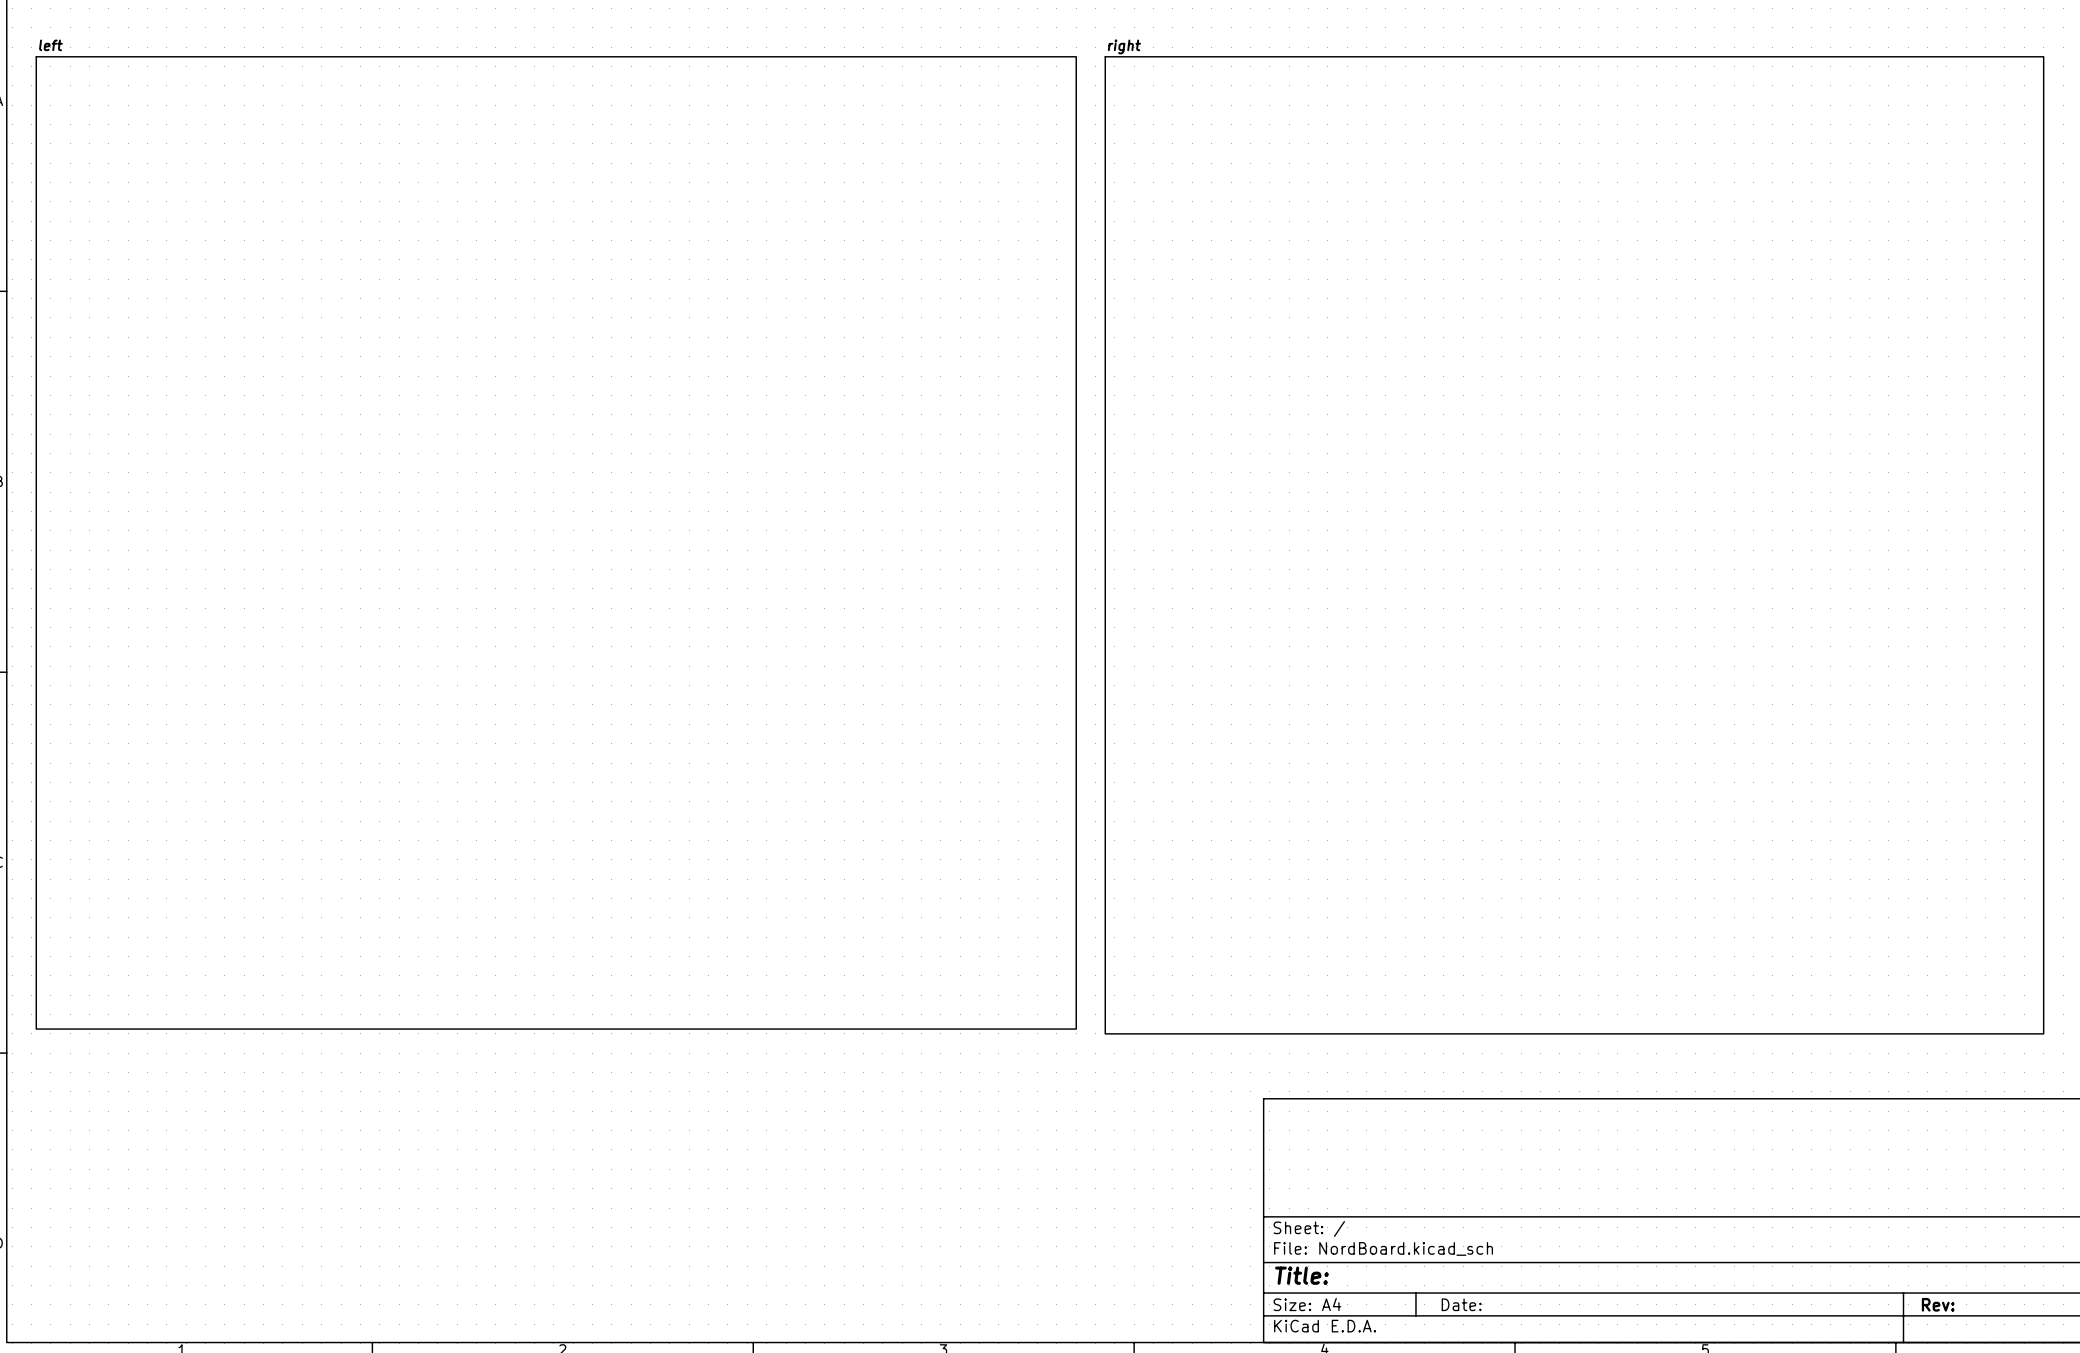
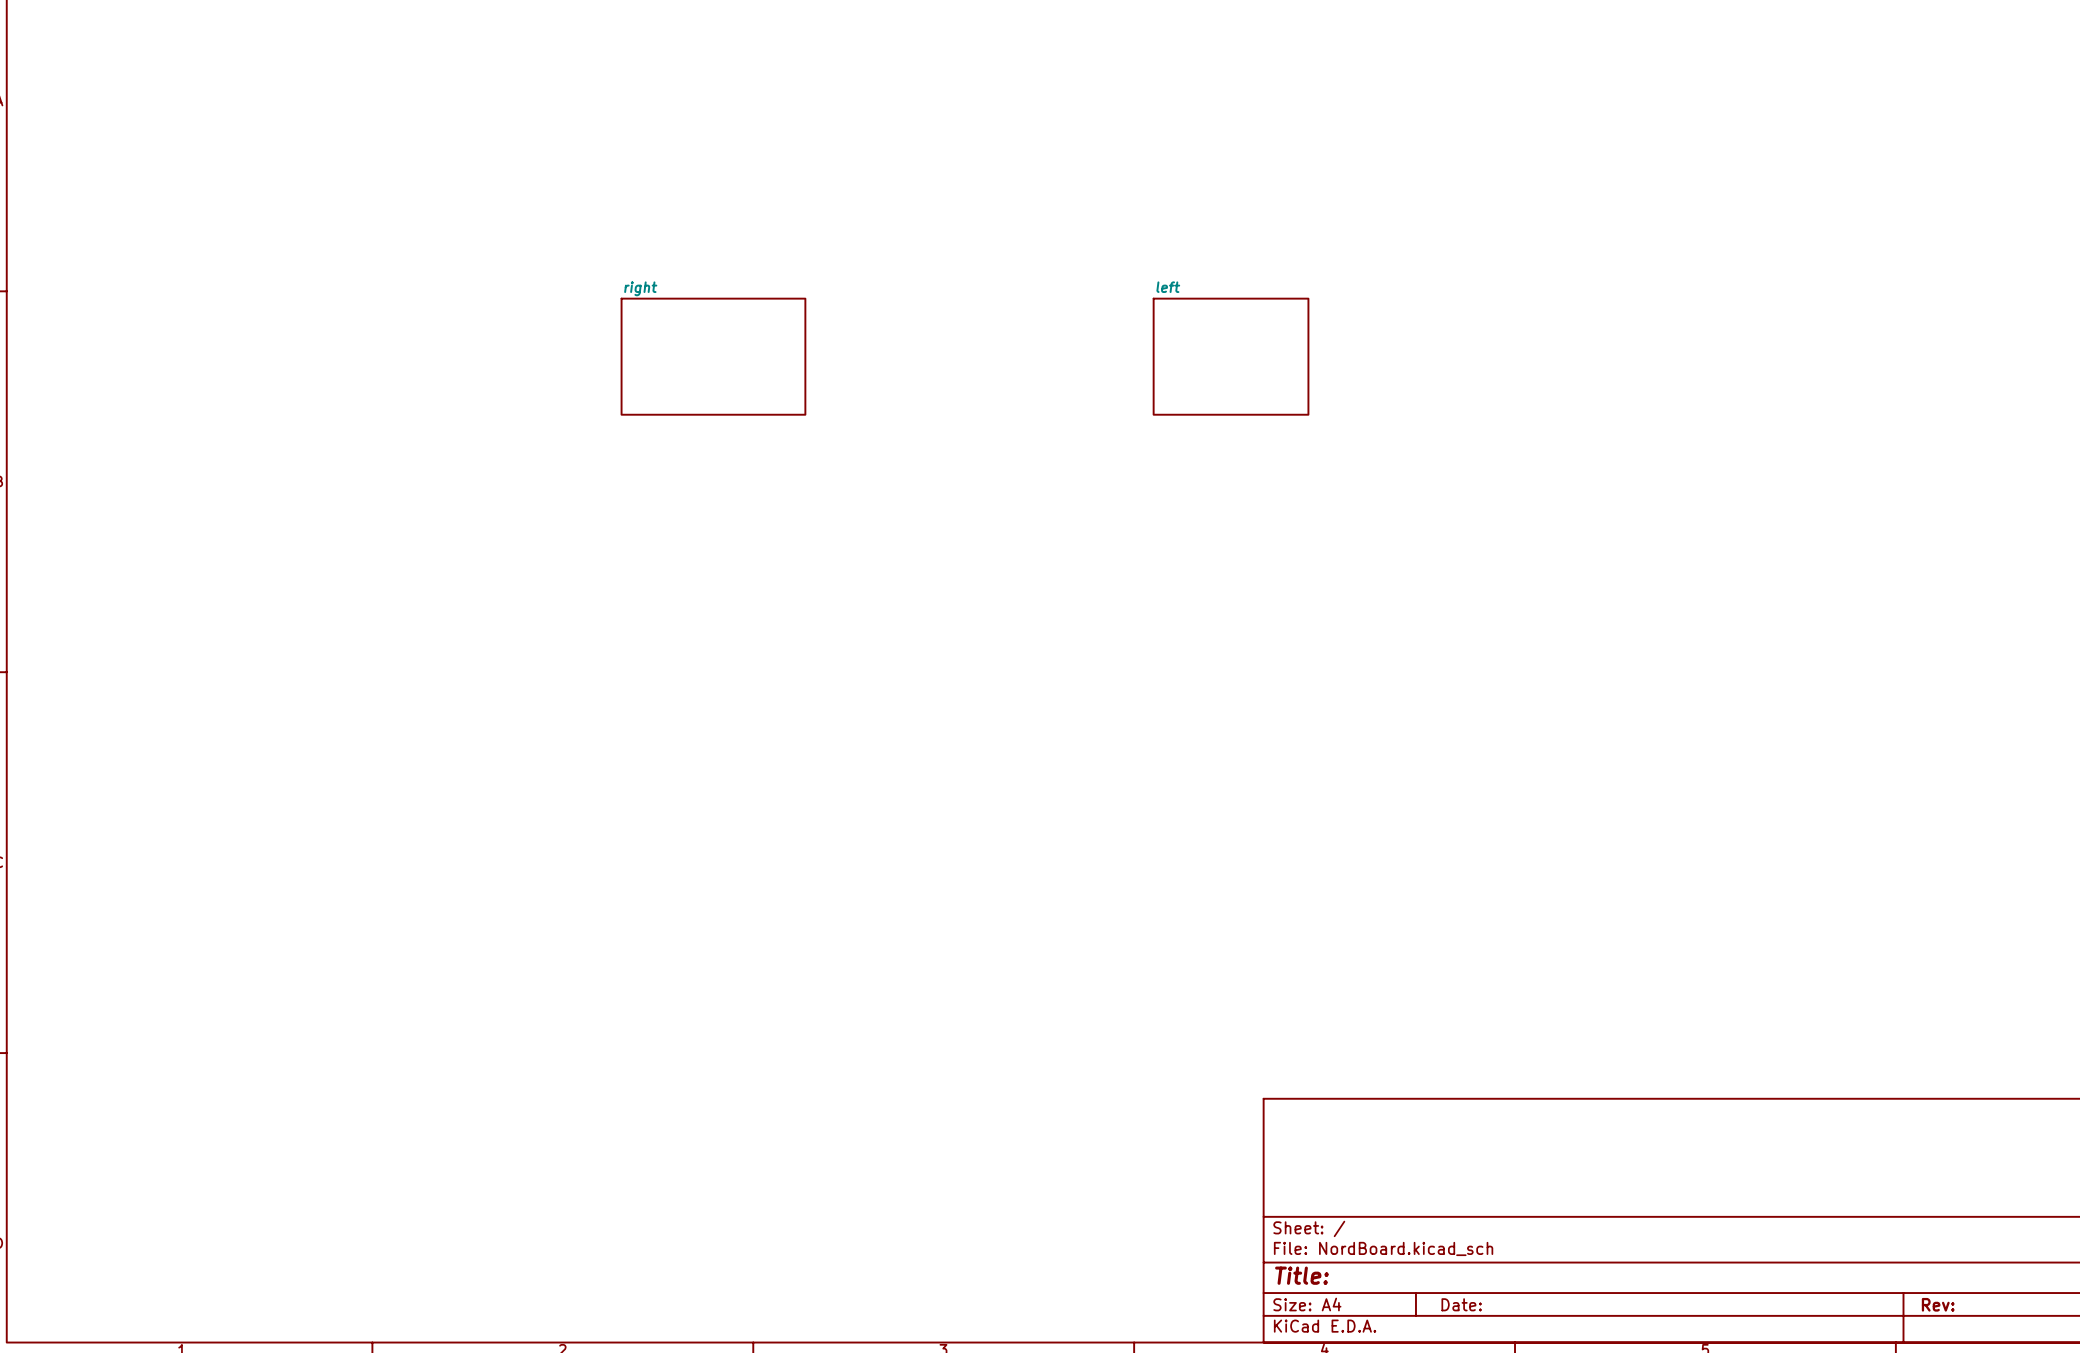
sheet right: none -> (713, 356)
sheet left: none -> (1231, 356)
sheet left: (556, 542) -> none
sheet right: (1574, 545) -> none

